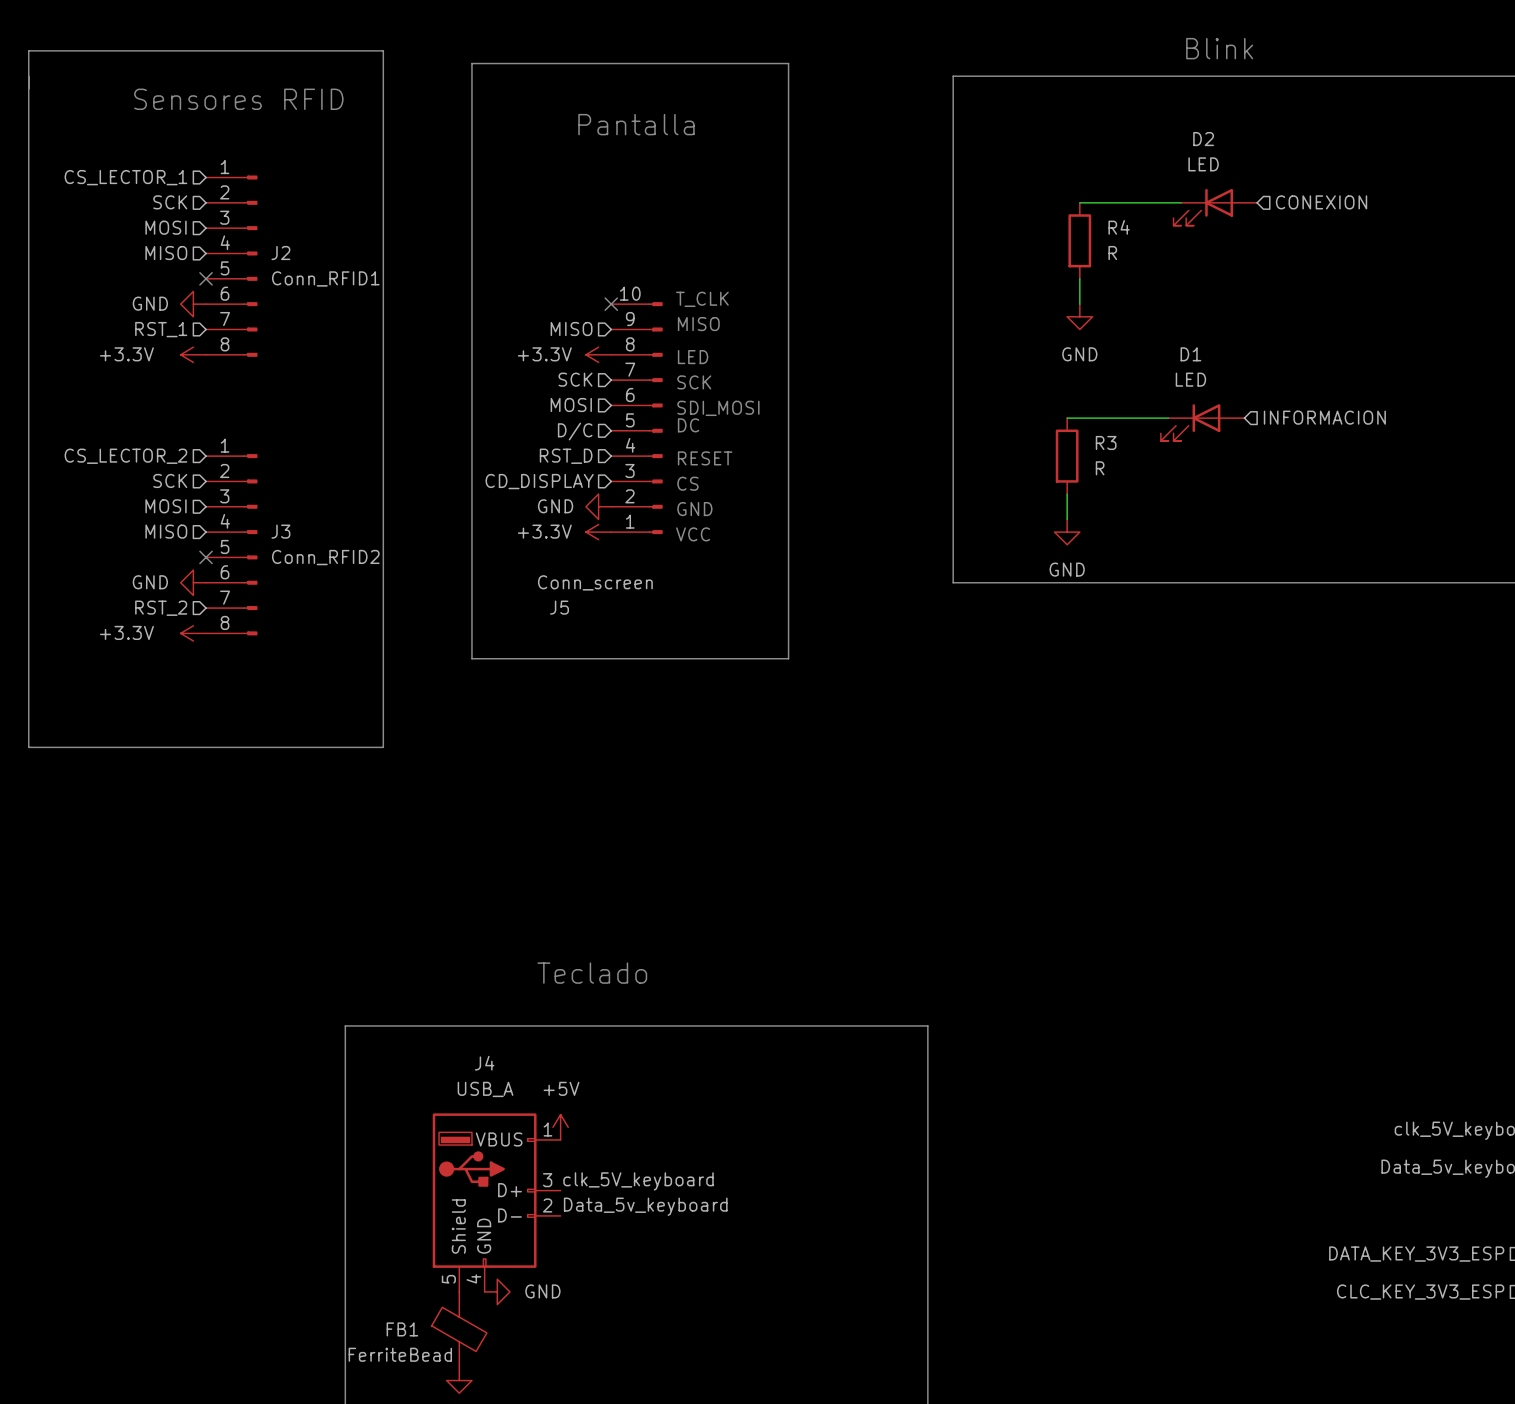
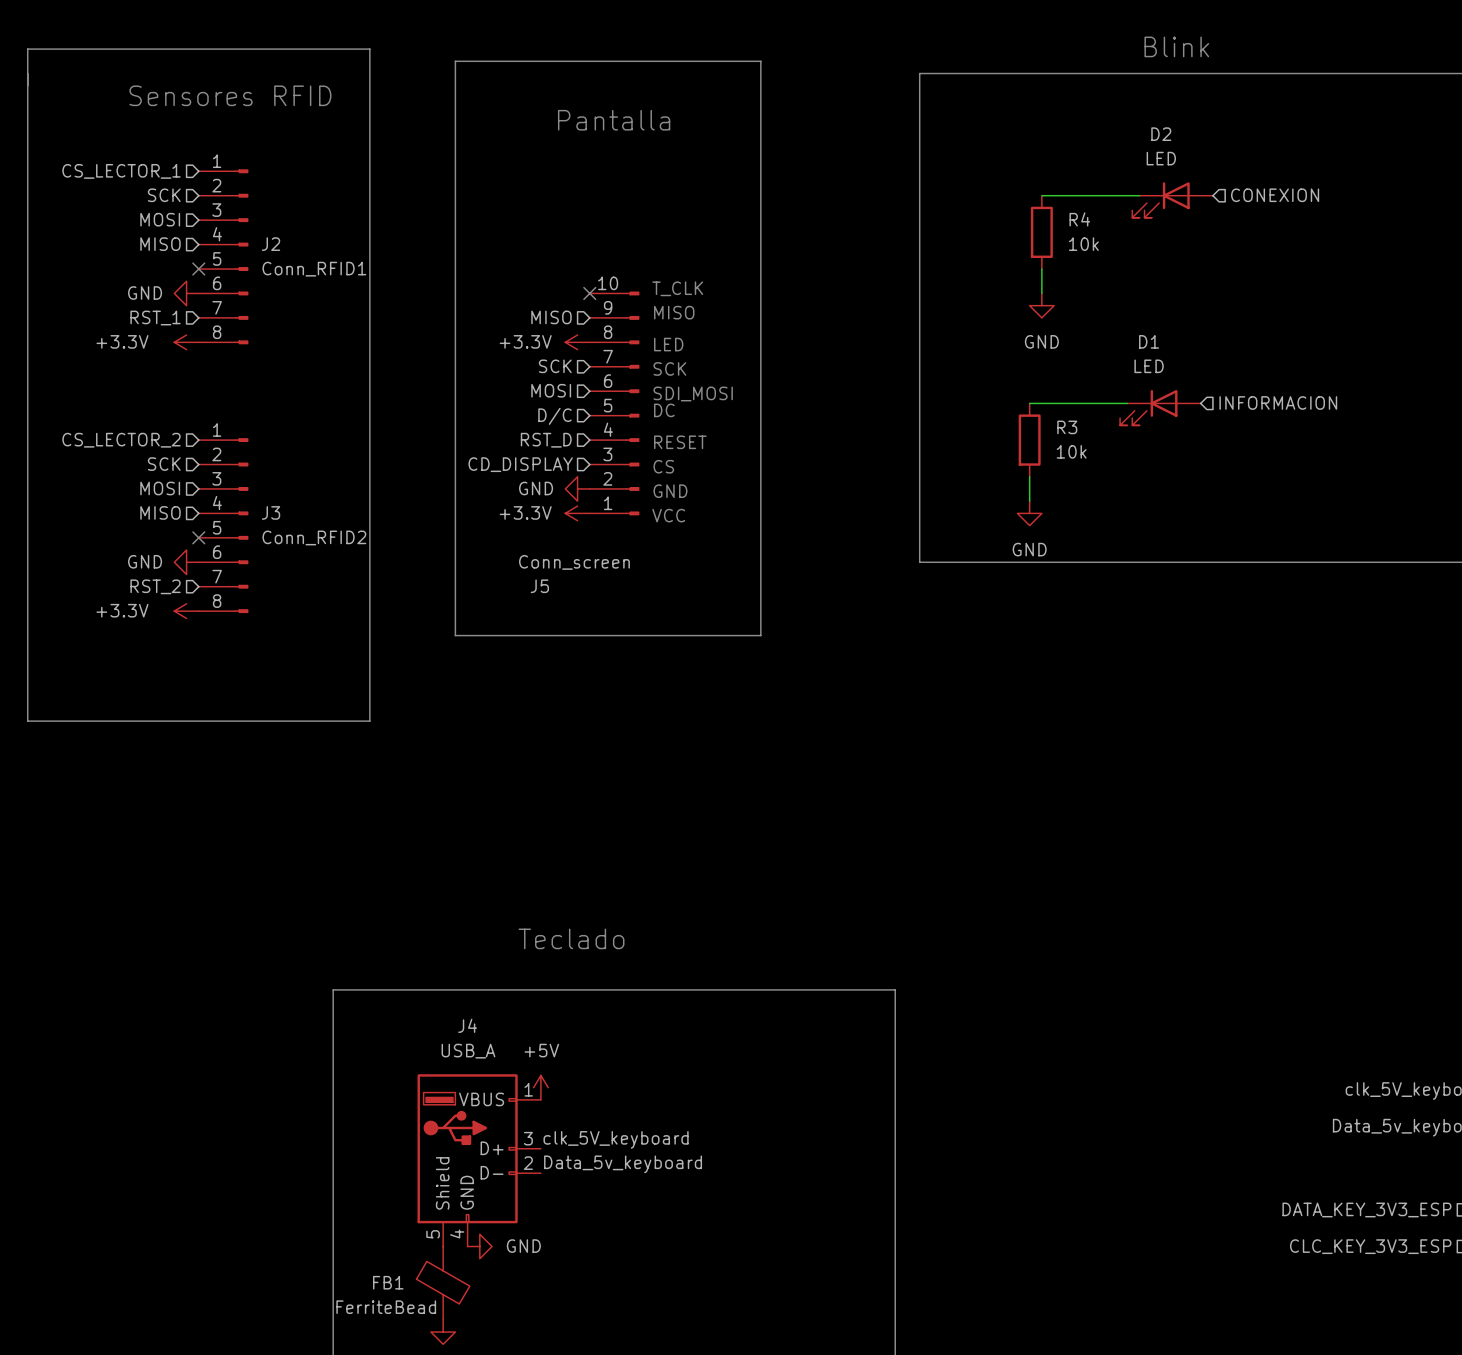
R4 value: R (1112, 253) -> 10k (1083, 244)
R3 value: R (1100, 468) -> 10k (1071, 451)

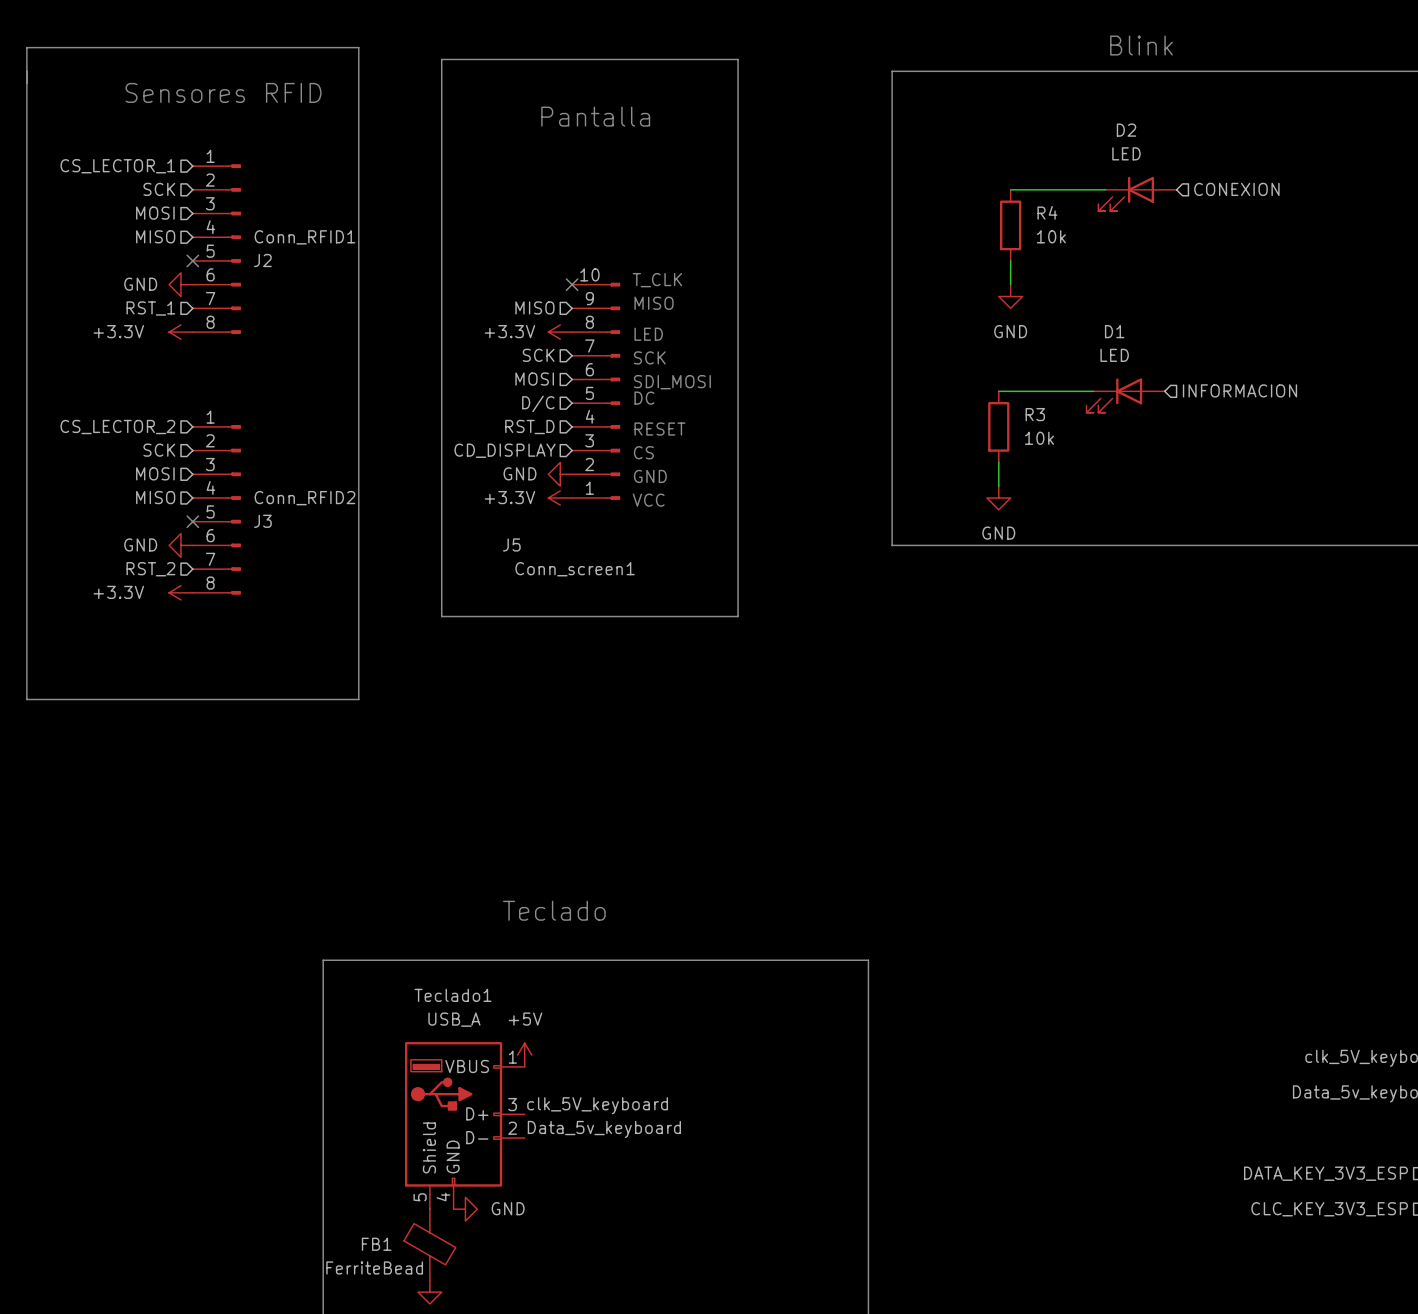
J2 name: J2 (271, 244) -> Conn_RFID1 (304, 237)
J2 value: Conn_RFID1 (314, 269) -> J2 (262, 260)
J3 name: J3 (271, 512) -> Conn_RFID2 (304, 498)
J3 value: Conn_RFID2 (314, 537) -> J3 (262, 521)
J5 value: Conn_screen (574, 562) -> J5 (511, 544)
J5 name: J5 (539, 586) -> Conn_screen1 (575, 569)
J4 name: J4 (467, 1025) -> Teclado1 (453, 995)

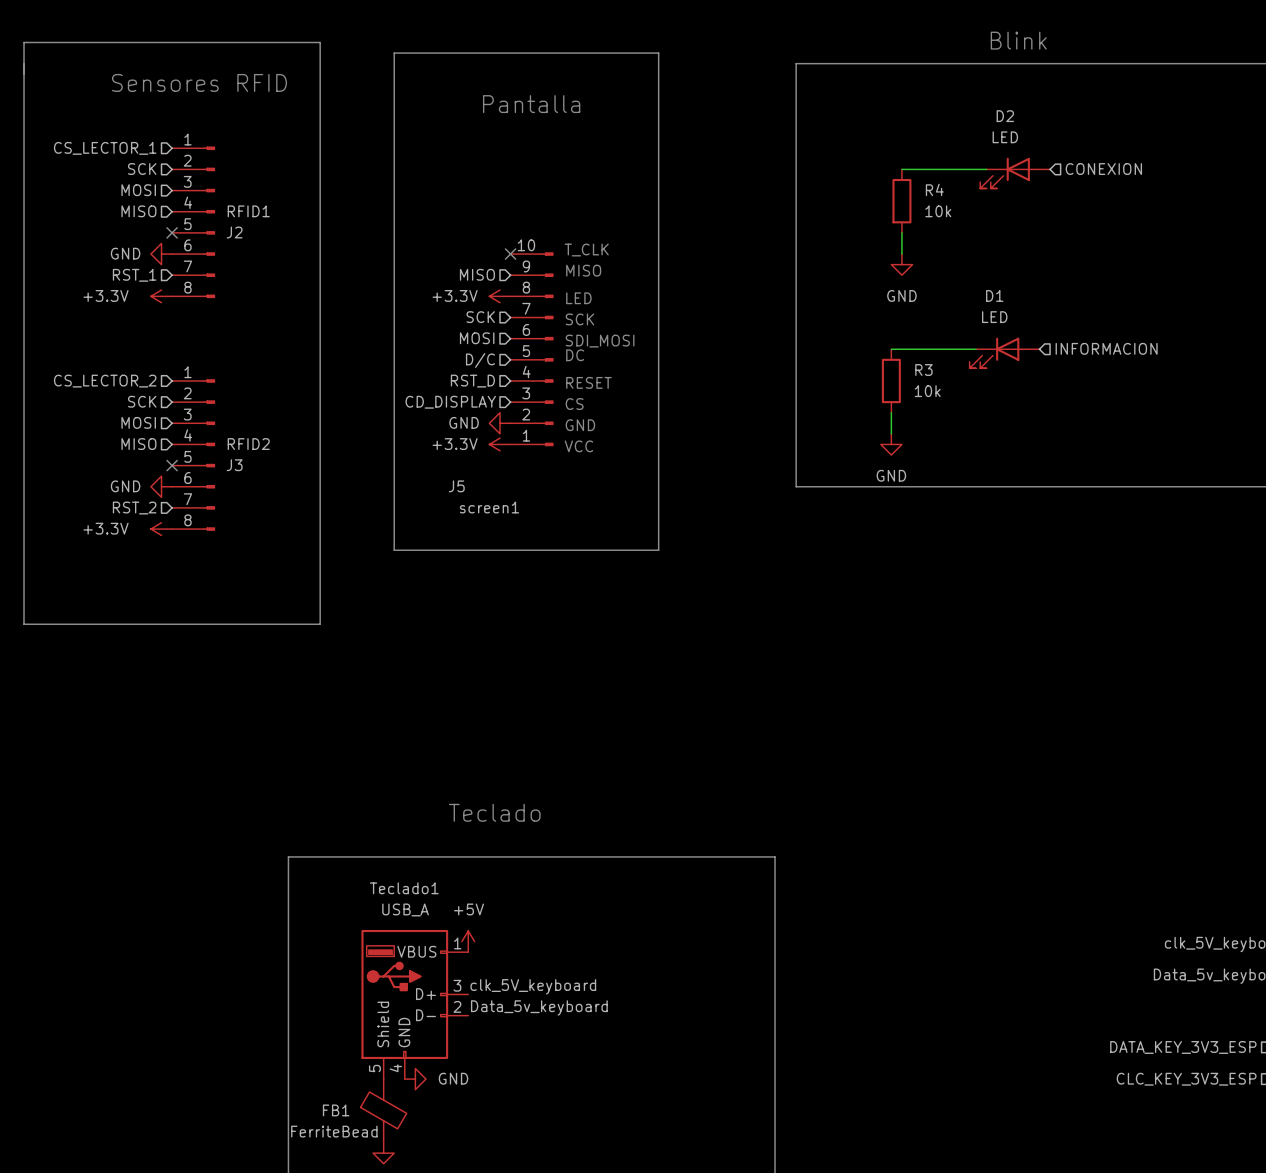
Conn_RFID1 name: Conn_RFID1 (304, 237) -> RFID1 (248, 211)
Conn_RFID2 name: Conn_RFID2 (304, 498) -> RFID2 (248, 444)
Conn_screen1 name: Conn_screen1 (575, 569) -> screen1 (489, 507)

